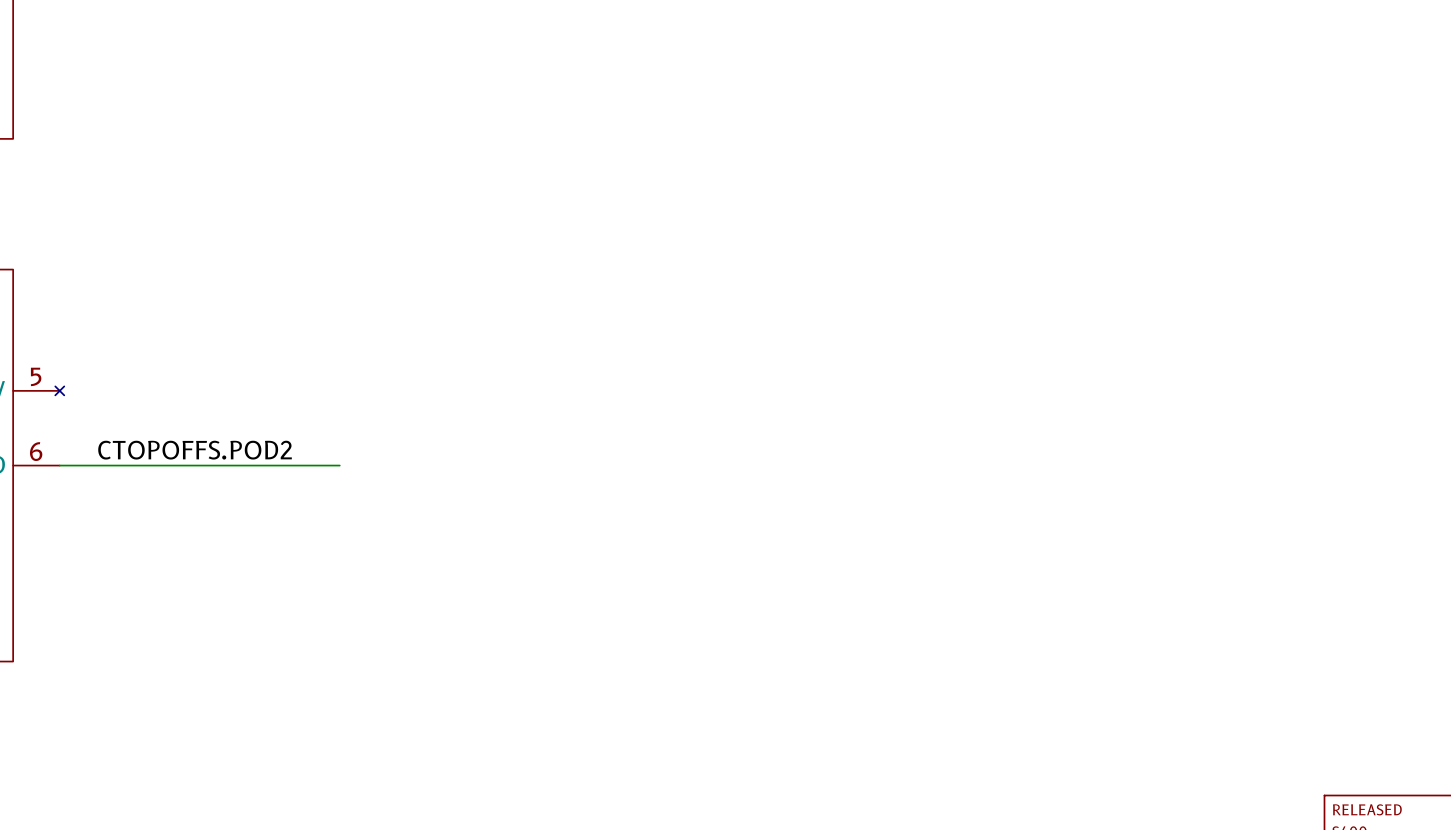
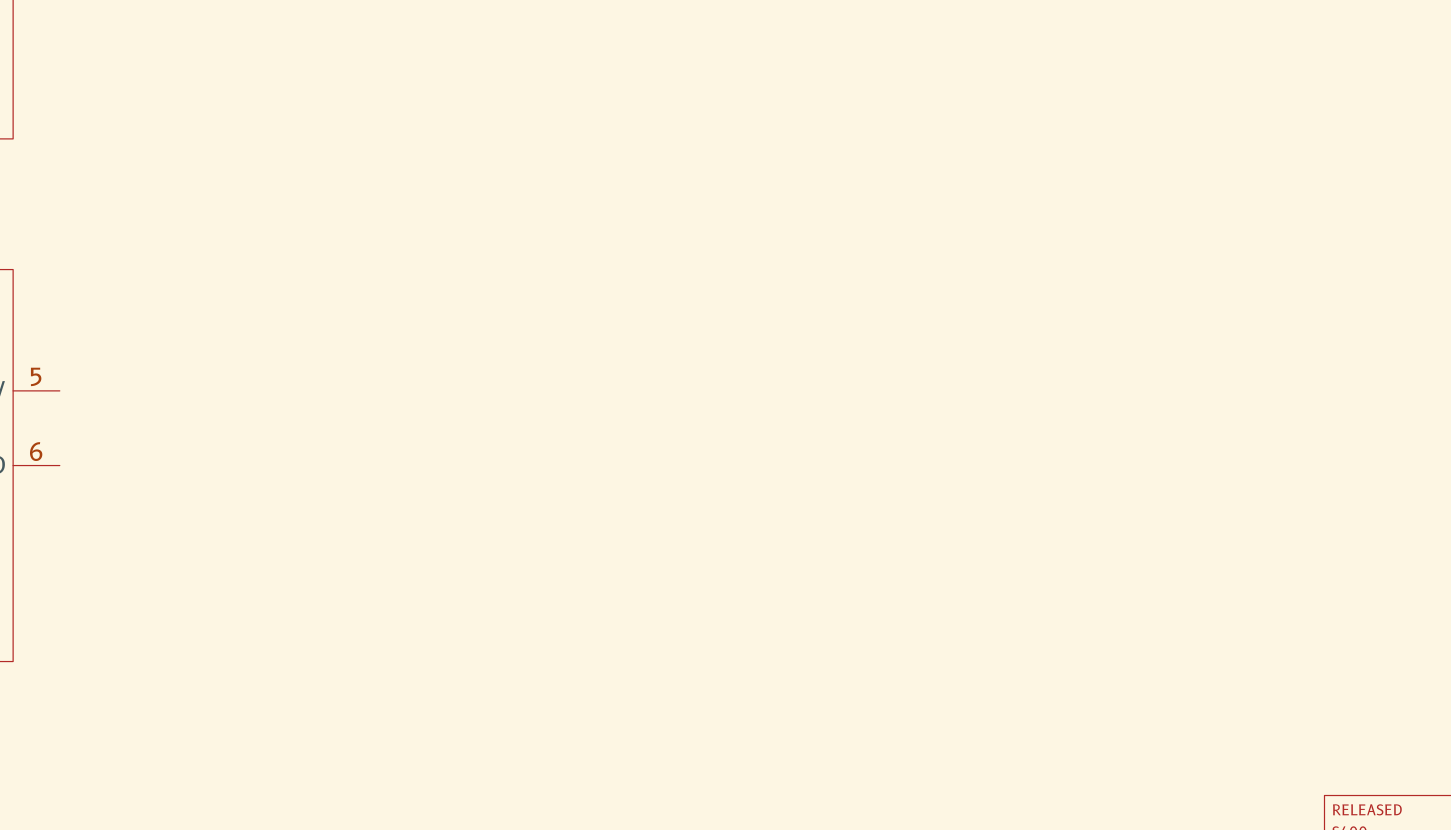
no-connect mark: (59, 390) -> none
label: CTOPOFFS.POD2 (195, 450) -> none
wire: (59, 465) (339, 465) -> none

